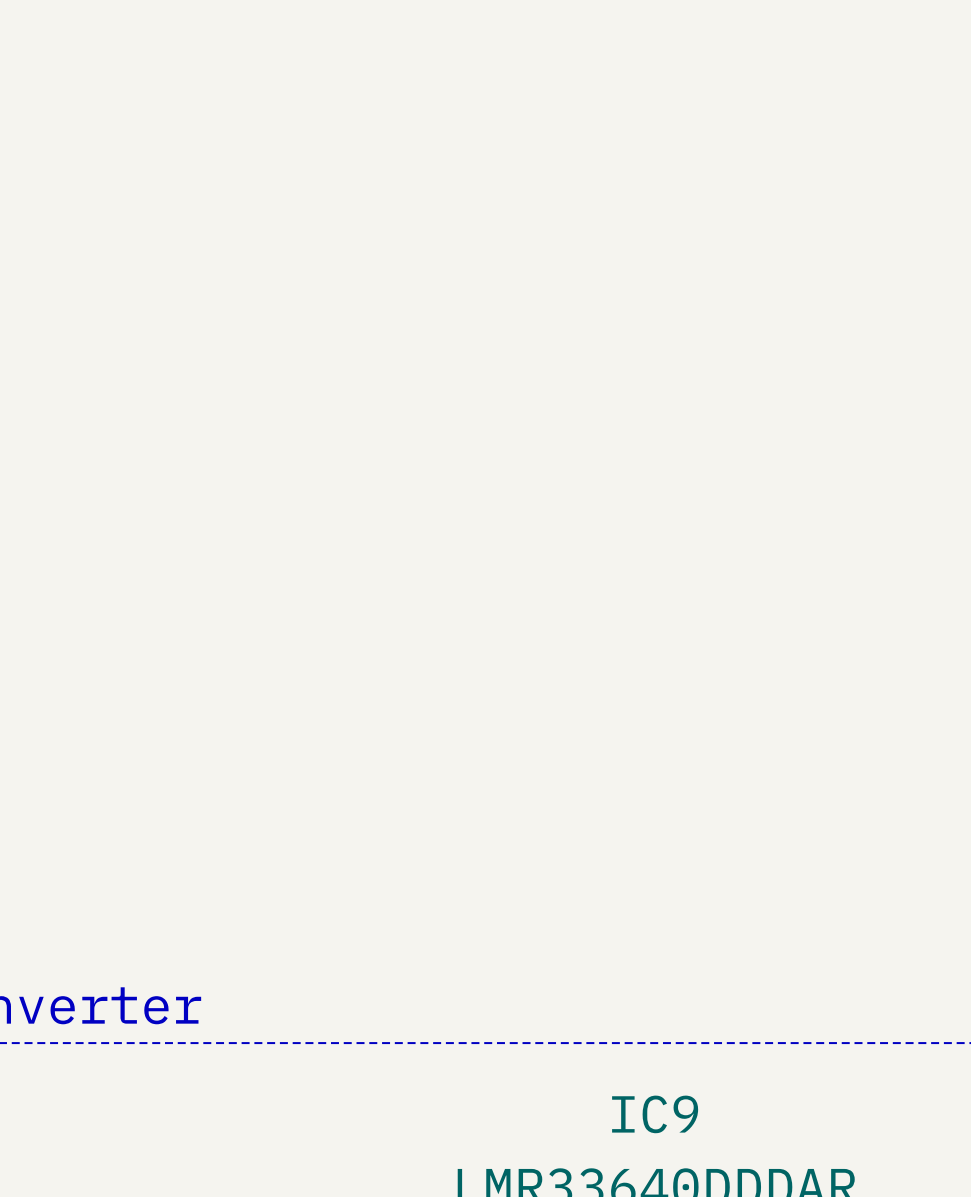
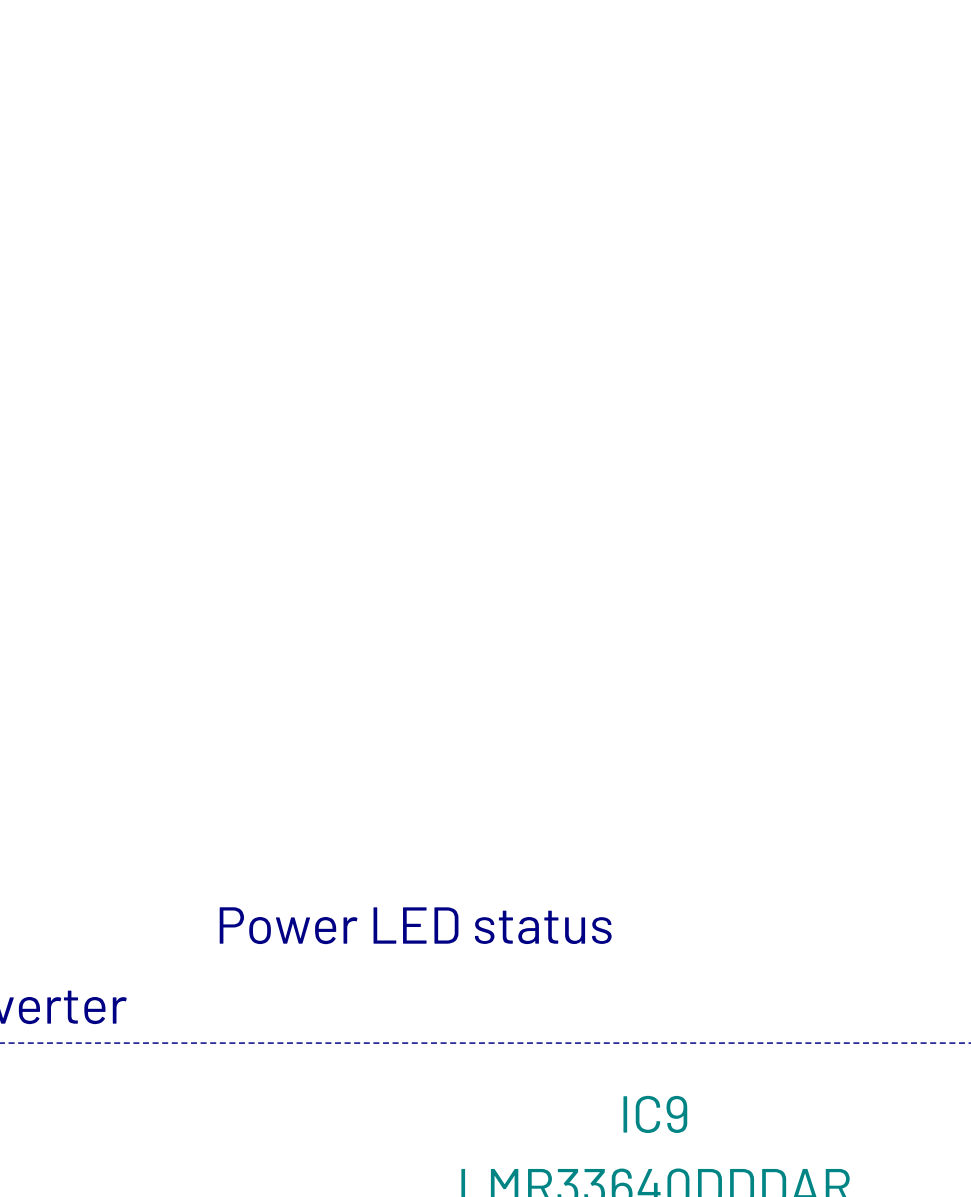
text: none -> Power LED status (415, 925)

